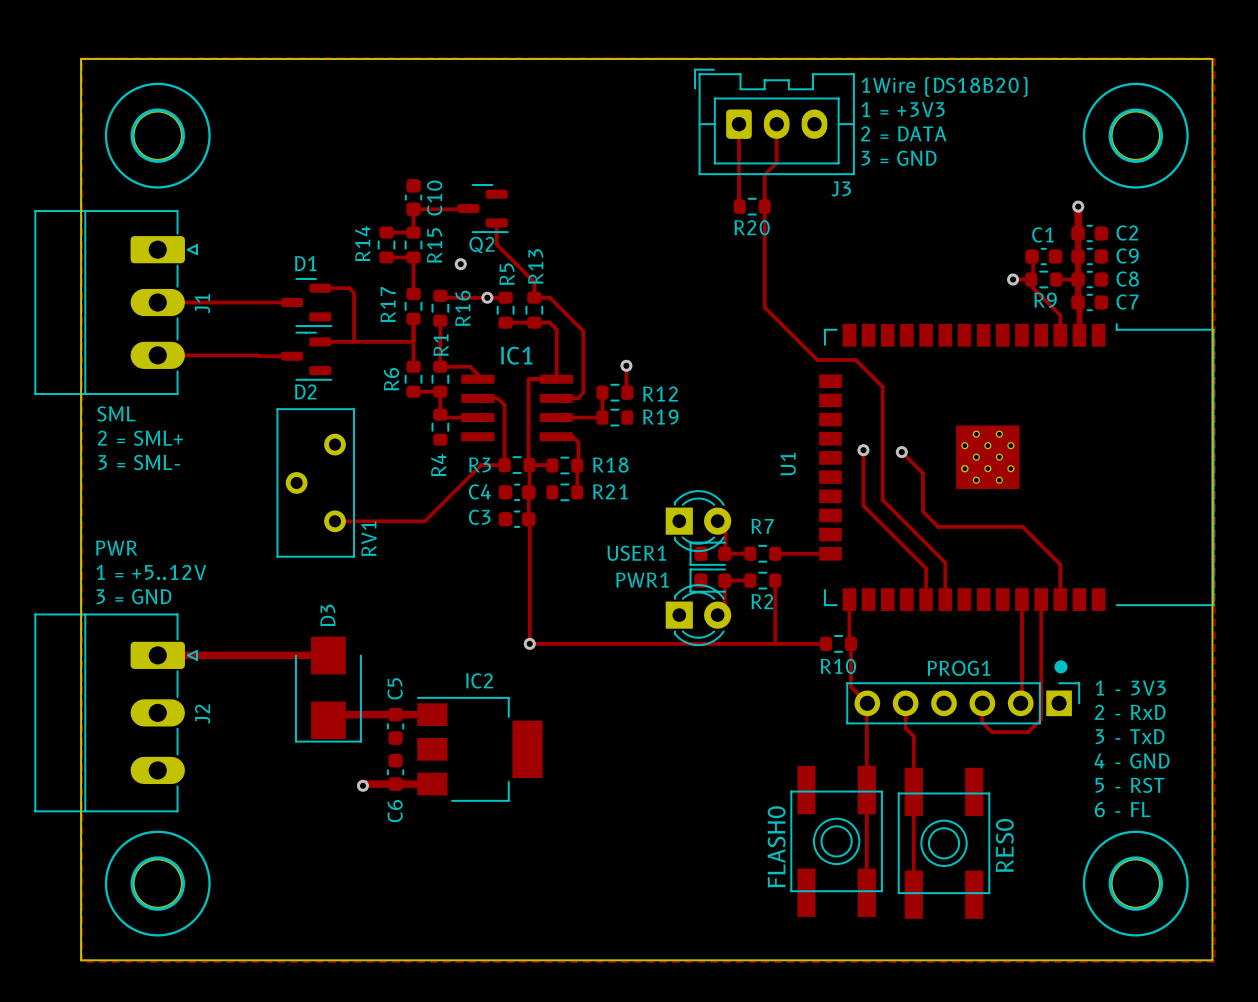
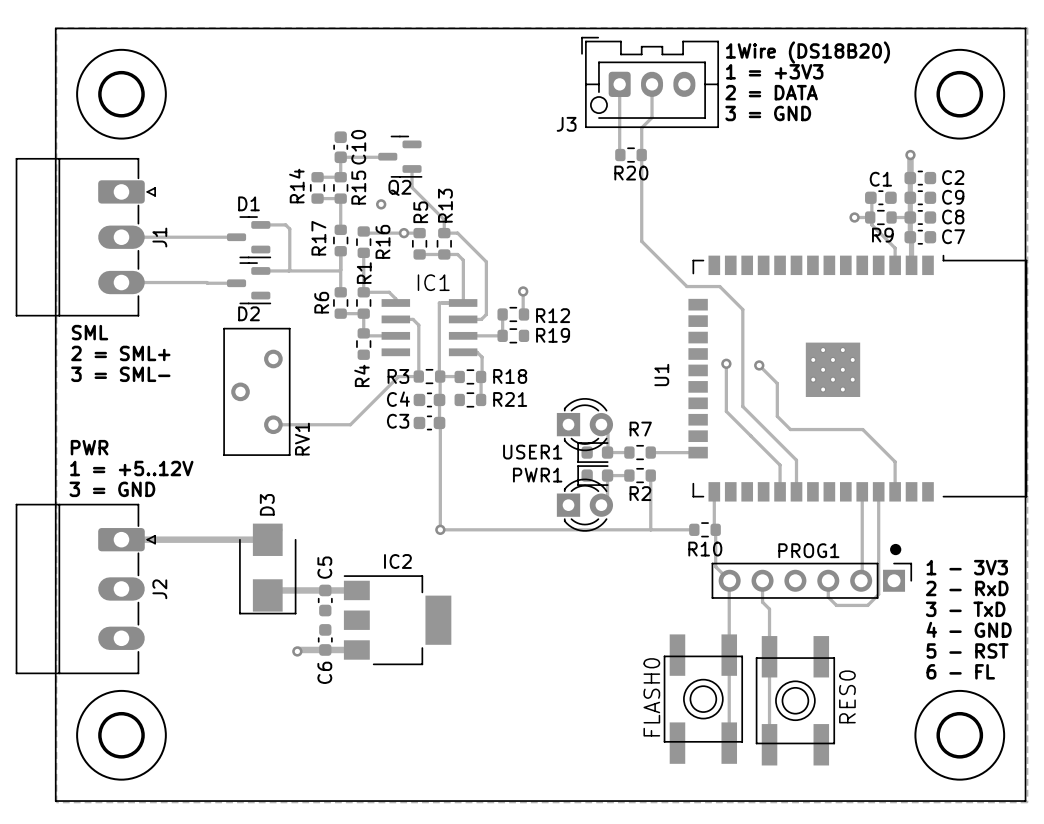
J3 footprint: [694, 68, 855, 176] -> [581, 36, 719, 128]
J3 name position: J3 (841, 188) -> J3 (566, 124)

